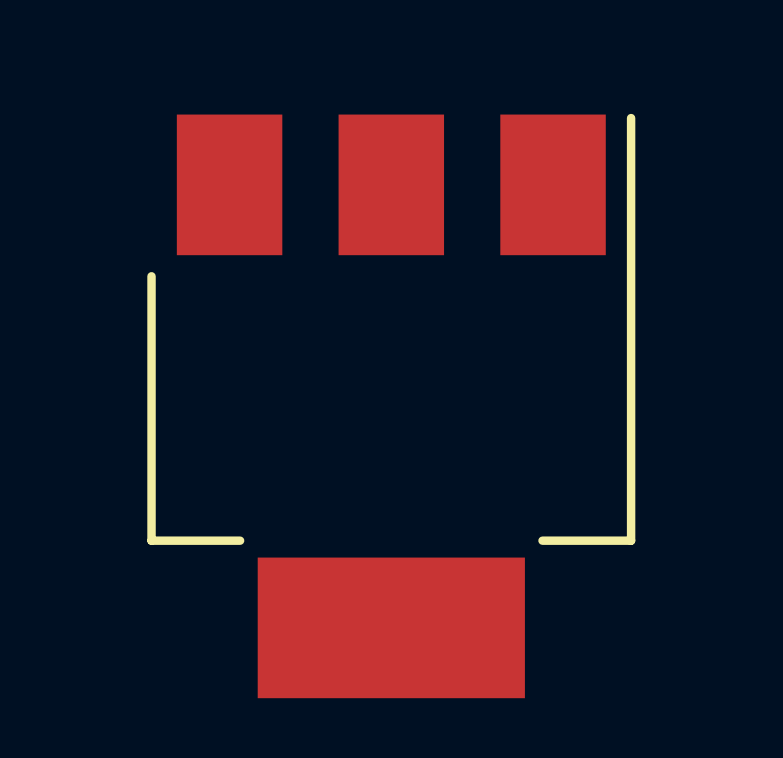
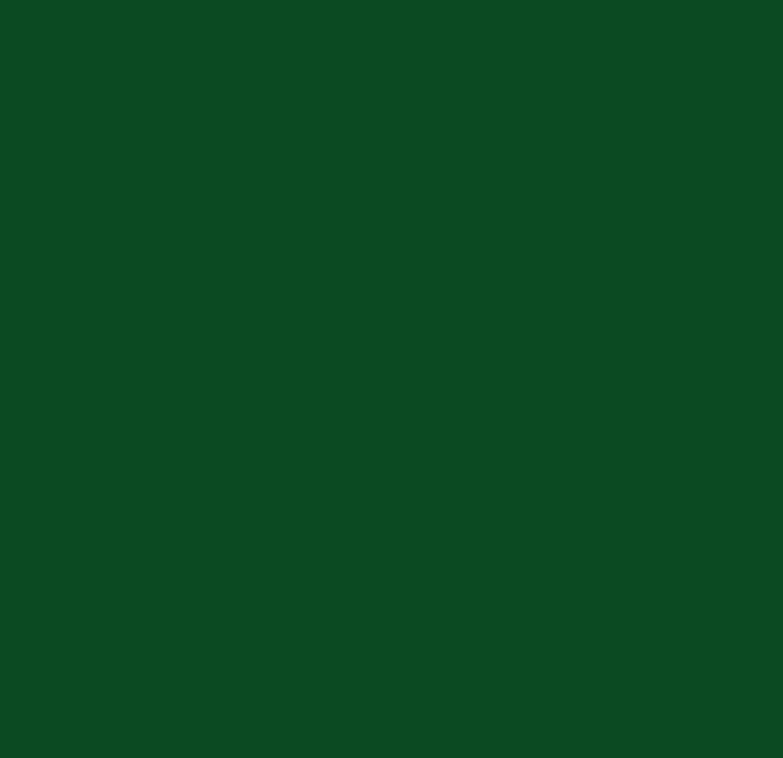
part: (391, 406) -> none

